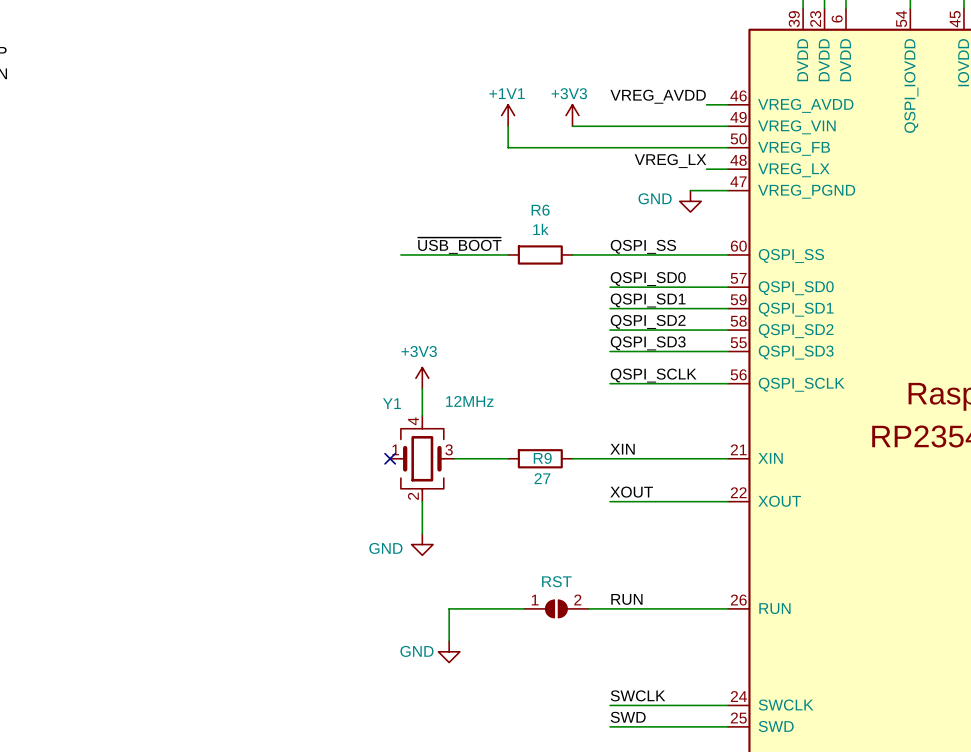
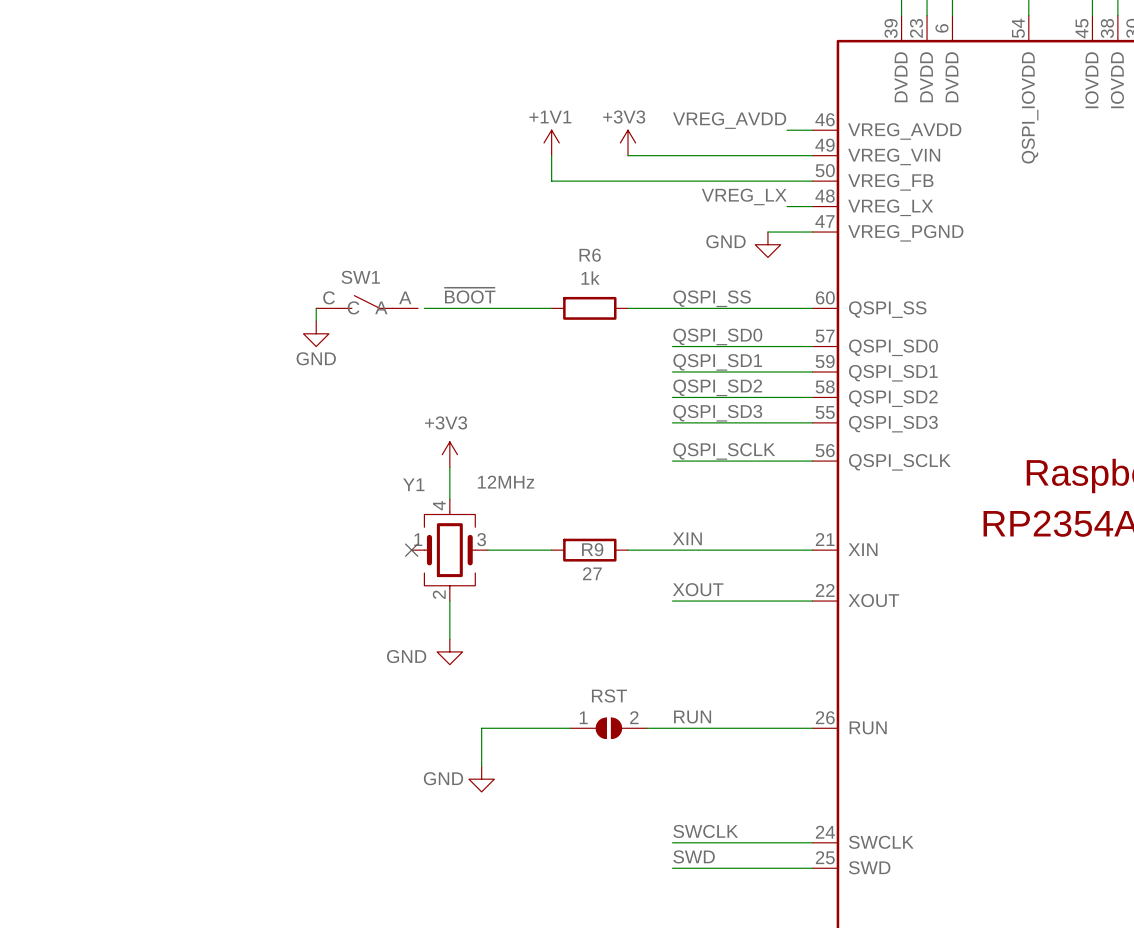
label: ~{USB_BOOT} (459, 245) -> ~{BOOT} (470, 295)
SW1: none -> (367, 302)
wire: none -> (316, 308) (316, 321)
power symbol: none -> GND (316, 333)

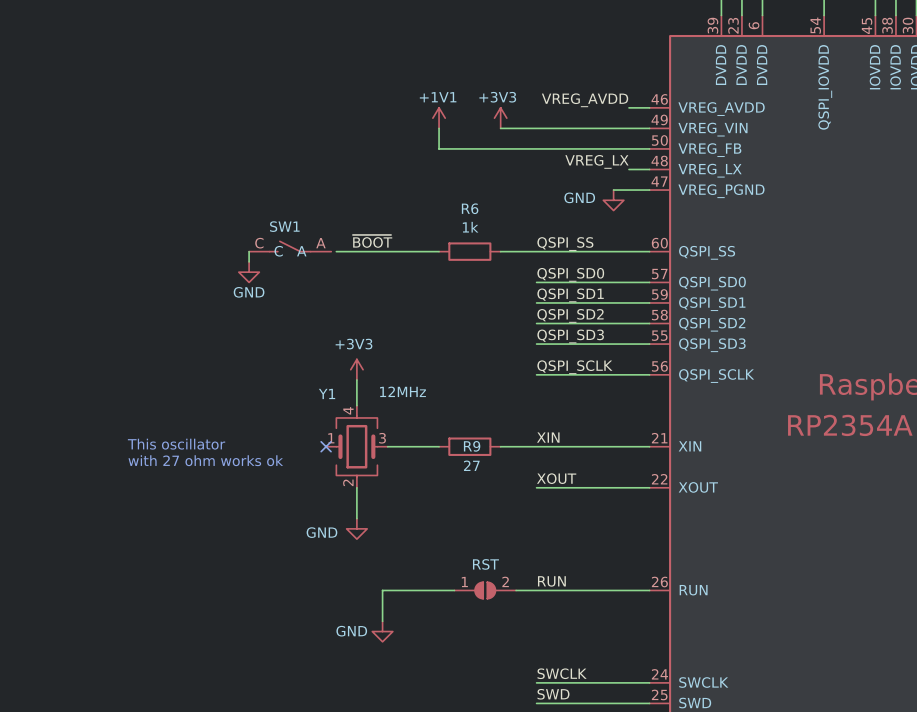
text: none -> This oscillator (176, 444)
text: none -> with 27 ohm works ok (205, 460)

